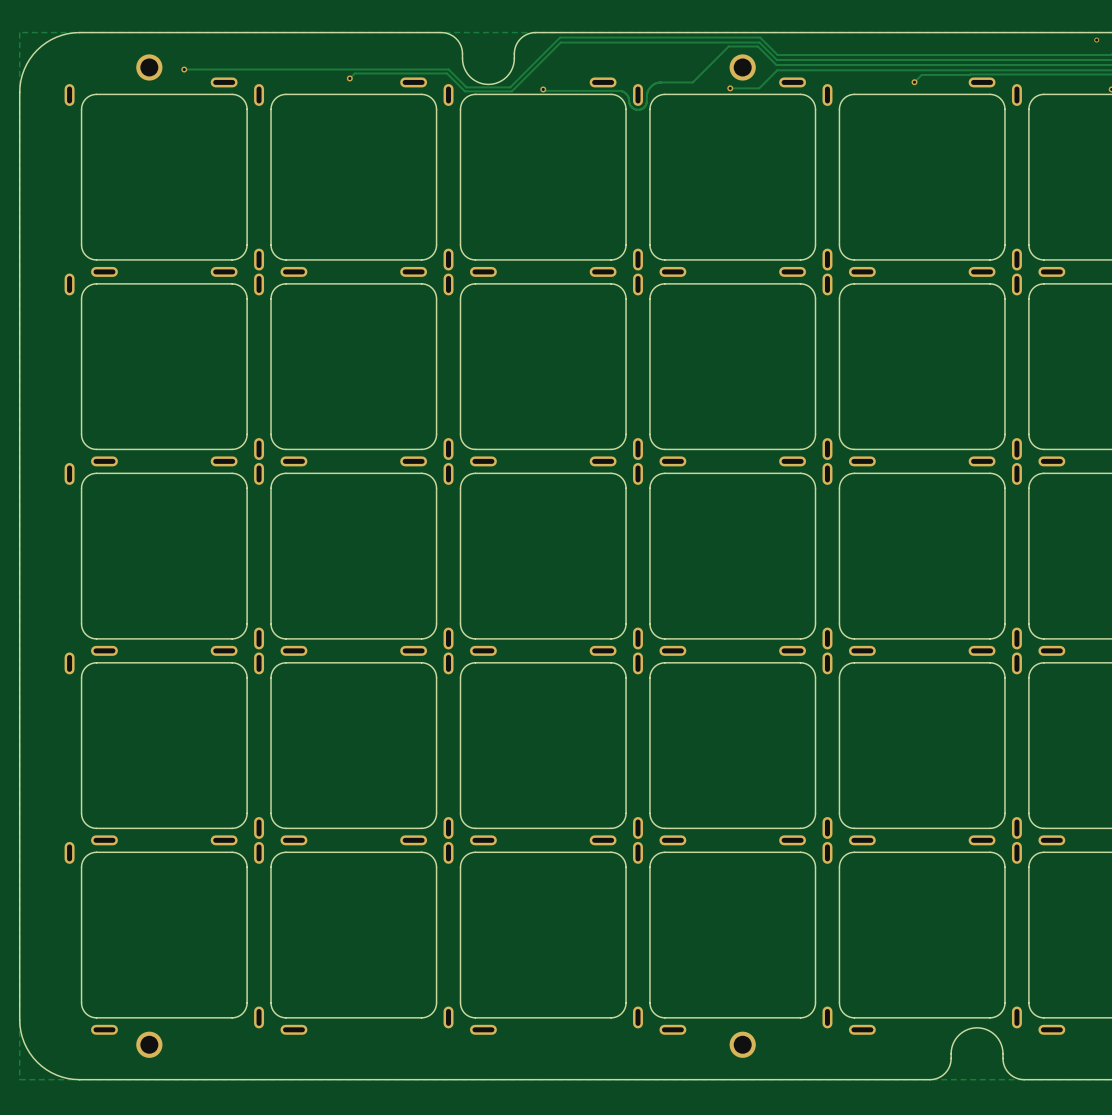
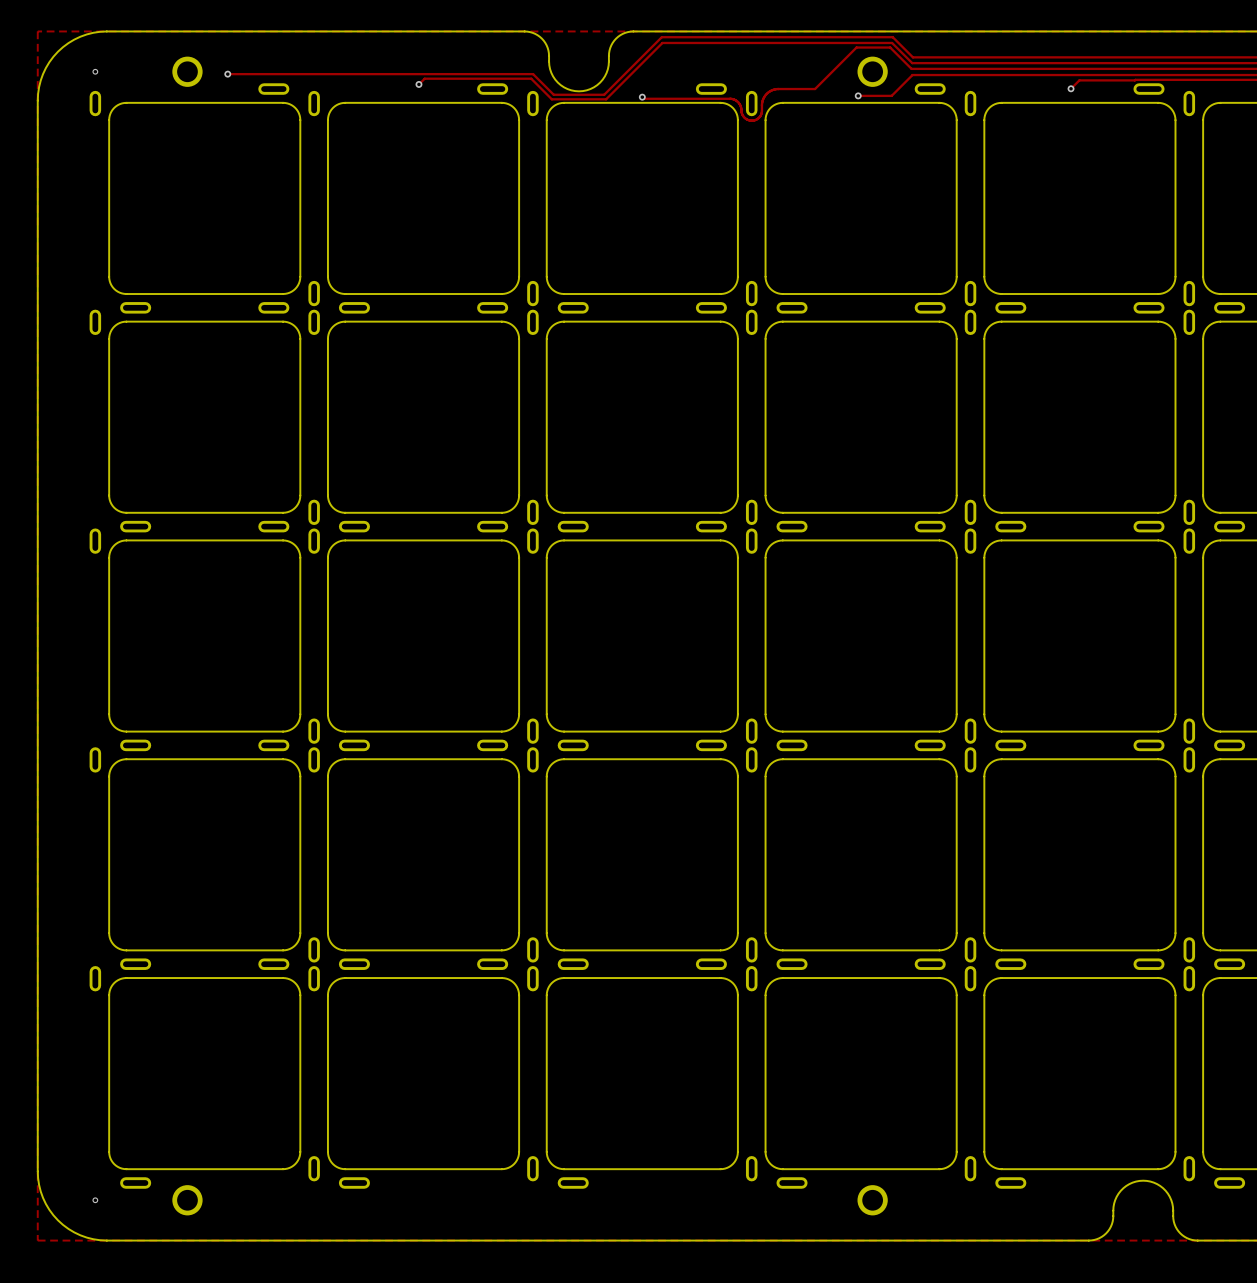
via: none -> (95, 71)
via: none -> (95, 1200)

